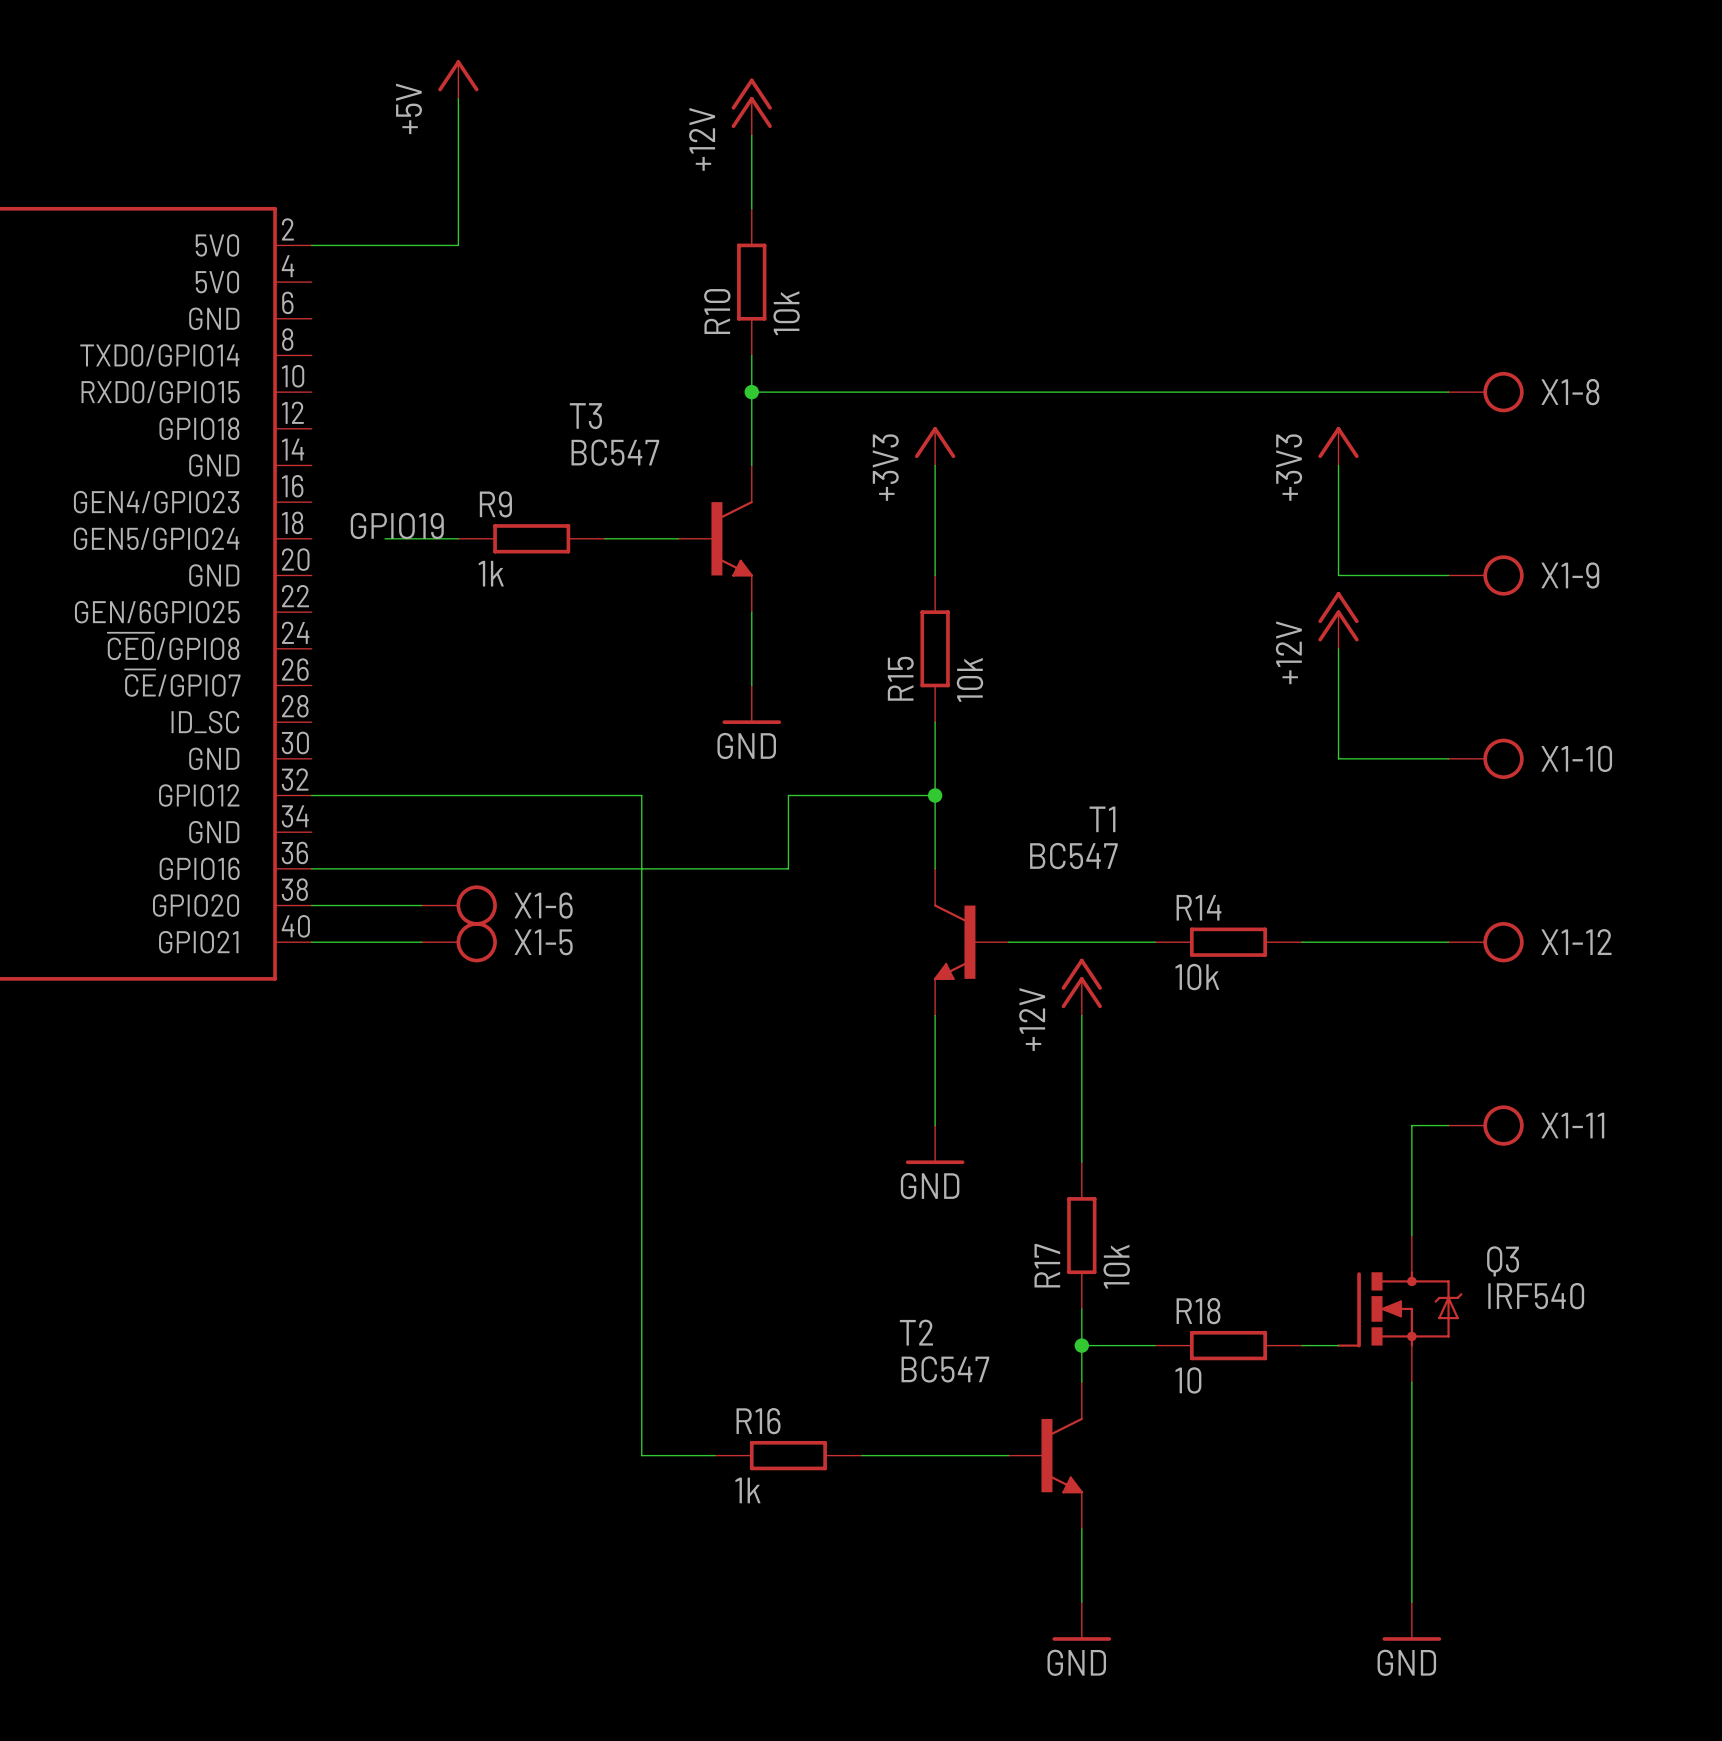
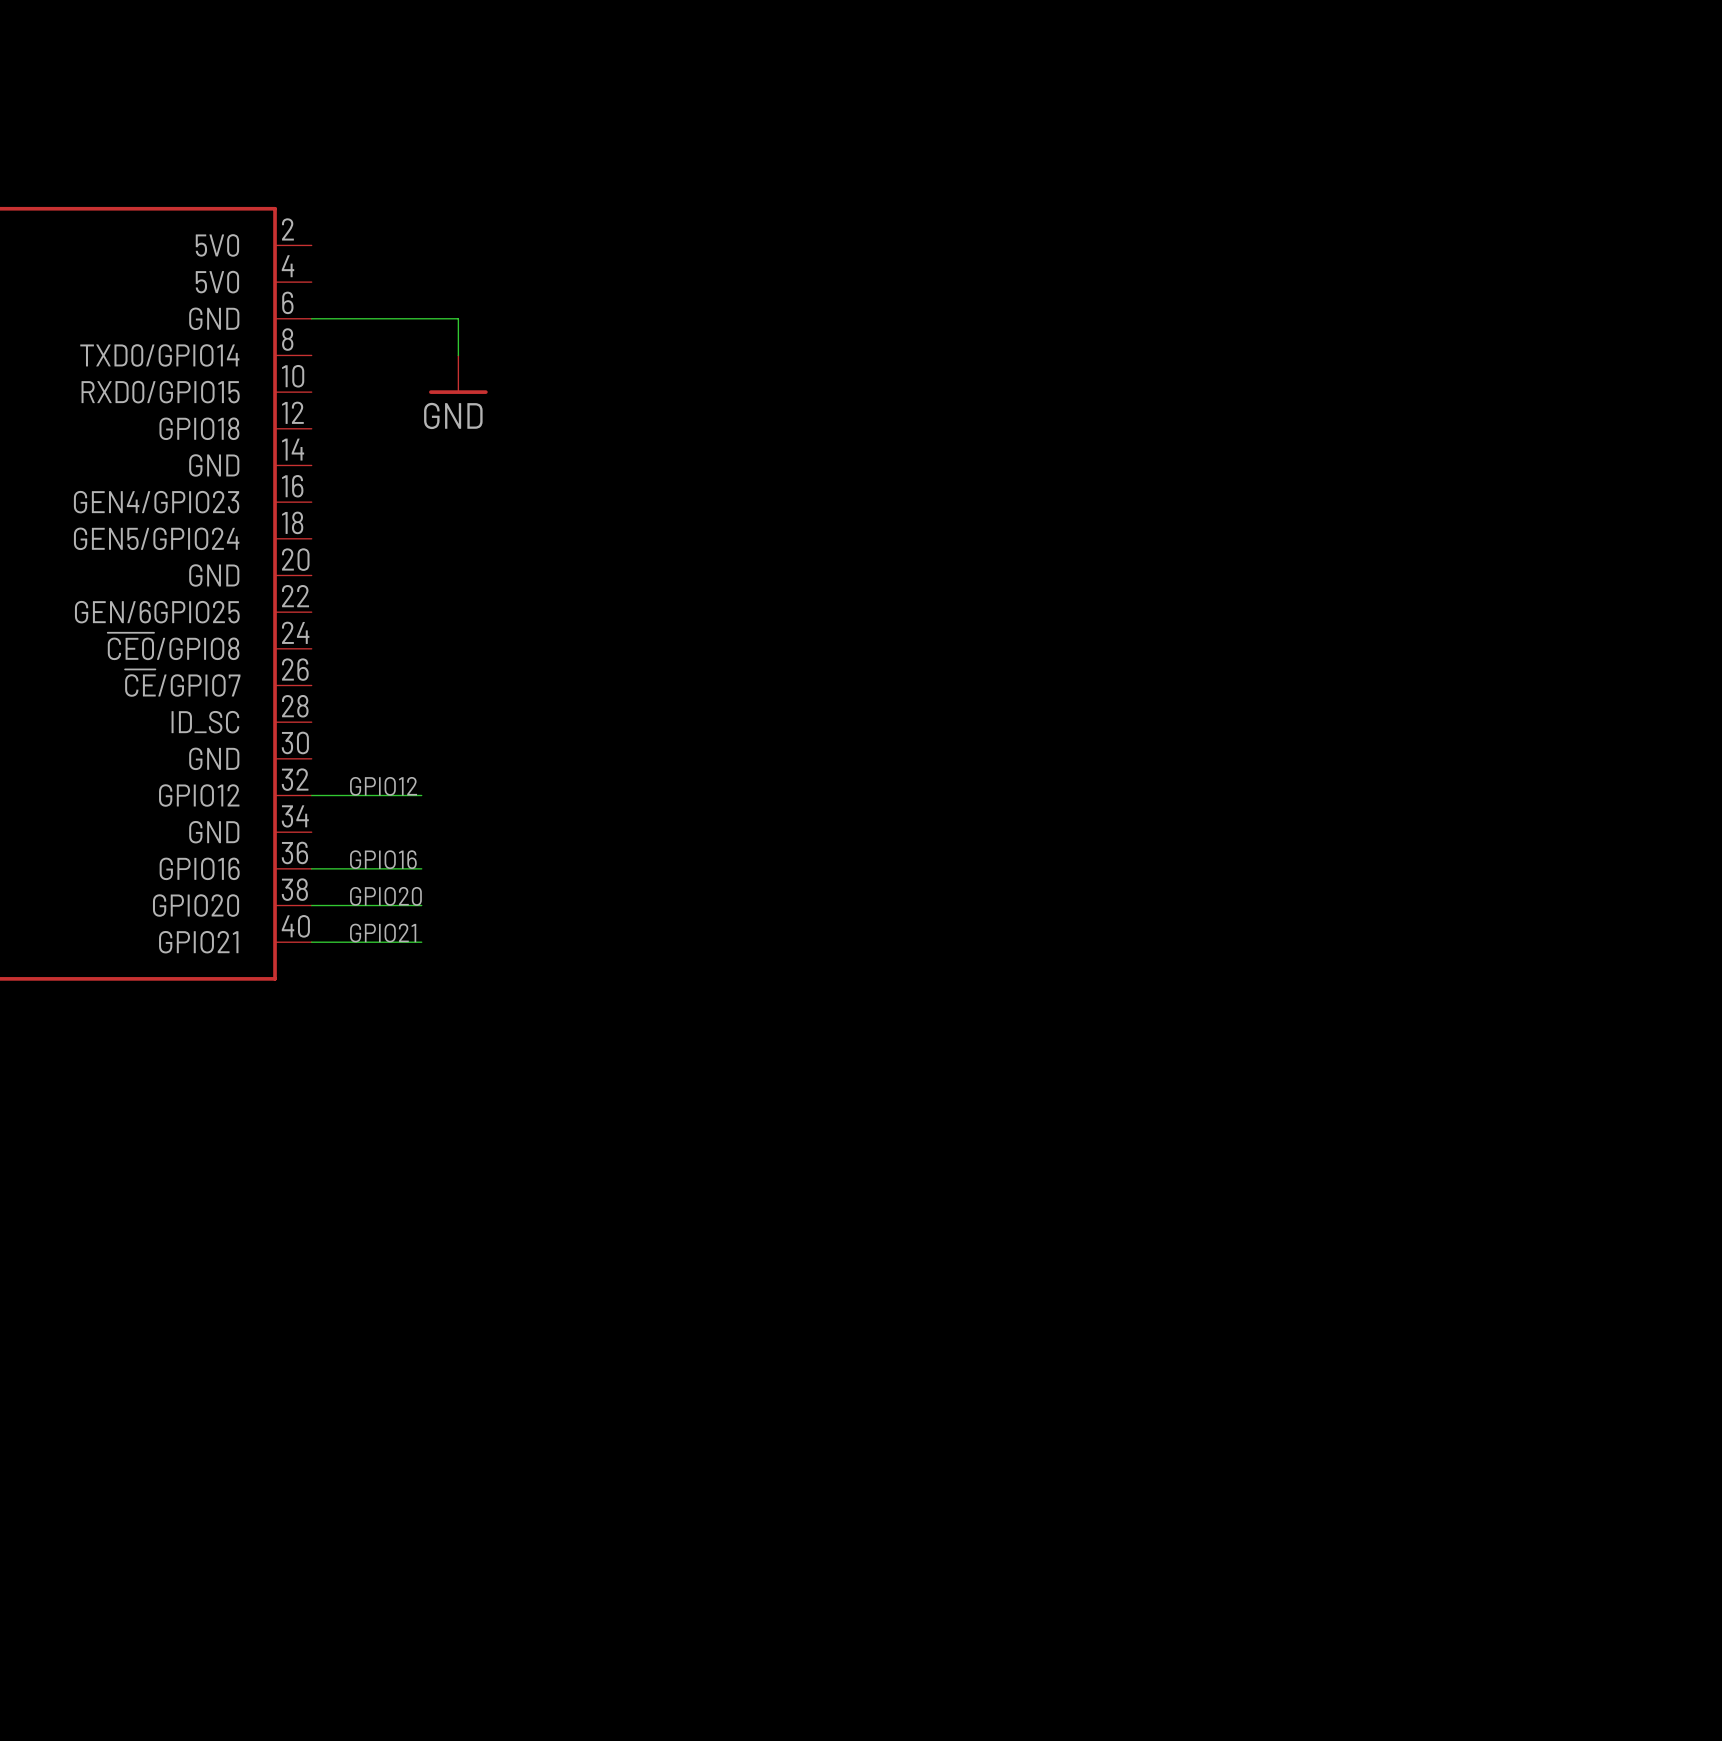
power symbol: +5V (458, 79) -> none
wire: (458, 98) (458, 245) (311, 245) -> none
power symbol: +12V (751, 106) -> none
wire: (751, 135) (751, 208) -> none
R10: 10k (751, 282) -> none
wire: none -> (311, 318) (458, 318) (458, 355)
wire: (751, 355) (751, 465) -> none
power symbol: none -> GND (458, 374)
wire: (751, 392) (1448, 392) -> none
junction: (751, 392) -> none
X1-8: (1486, 392) -> none
power symbol: +3V3 (935, 446) -> none
power symbol: +3V3 (1338, 446) -> none
wire: (935, 465) (935, 575) -> none
wire: (1338, 465) (1338, 575) (1448, 575) -> none
label: GPIO19 (397, 525) -> none
wire: (385, 538) (458, 538) -> none
R9: 1k (531, 538) -> none
wire: (605, 538) (678, 538) -> none
T3: BC547 (715, 538) -> none
X1-9: (1486, 575) -> none
wire: (751, 612) (751, 685) -> none
power symbol: +12V (1338, 620) -> none
R15: 10k (935, 648) -> none
wire: (1338, 648) (1338, 758) (1448, 758) -> none
power symbol: GND (751, 704) -> none
wire: (935, 722) (935, 868) -> none
X1-10: (1486, 758) -> none
label: none -> GPIO12 (383, 786)
wire: (421, 795) (641, 795) (641, 1455) (715, 1455) -> none
wire: (935, 795) (788, 795) (788, 868) (421, 868) -> none
junction: (935, 795) -> none
label: none -> GPIO16 (383, 859)
label: none -> GPIO20 (385, 896)
X1-6: (459, 905) -> none
label: none -> GPIO21 (383, 933)
X1-5: (459, 942) -> none
T1: BC547 (971, 942) -> none
wire: (1008, 942) (1155, 942) -> none
R14: 10k (1228, 942) -> none
wire: (1301, 942) (1448, 942) -> none
X1-12: (1486, 942) -> none
power symbol: +12V (1081, 987) -> none
wire: (935, 1015) (935, 1125) -> none
wire: (1081, 1015) (1081, 1162) -> none
wire: (1448, 1125) (1411, 1125) (1411, 1235) -> none
X1-11: (1486, 1125) -> none
power symbol: GND (935, 1144) -> none
R17: 10k (1081, 1235) -> none
wire: (1081, 1308) (1081, 1382) -> none
Q3: IRF540 (1399, 1308) -> none
wire: (1081, 1345) (1155, 1345) -> none
junction: (1081, 1345) -> none
R18: 10 (1228, 1345) -> none
wire: (1301, 1345) (1338, 1345) -> none
wire: (1411, 1382) (1411, 1602) -> none
R16: 1k (788, 1455) -> none
wire: (861, 1455) (1008, 1455) -> none
T2: BC547 (1045, 1455) -> none
wire: (1081, 1528) (1081, 1602) -> none
power symbol: GND (1081, 1621) -> none
power symbol: GND (1411, 1621) -> none

